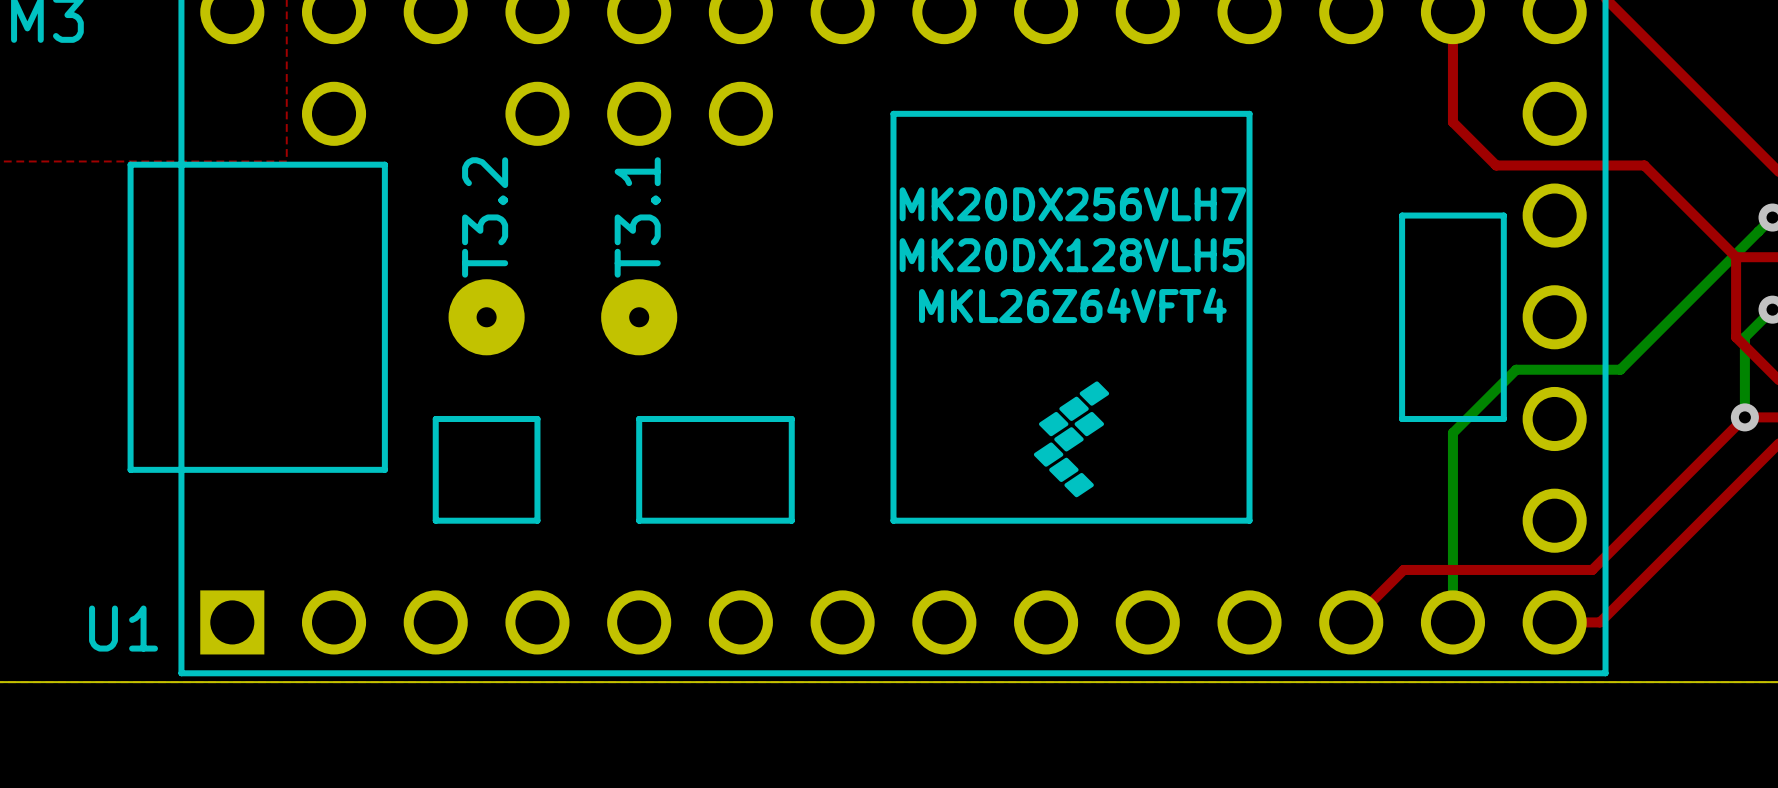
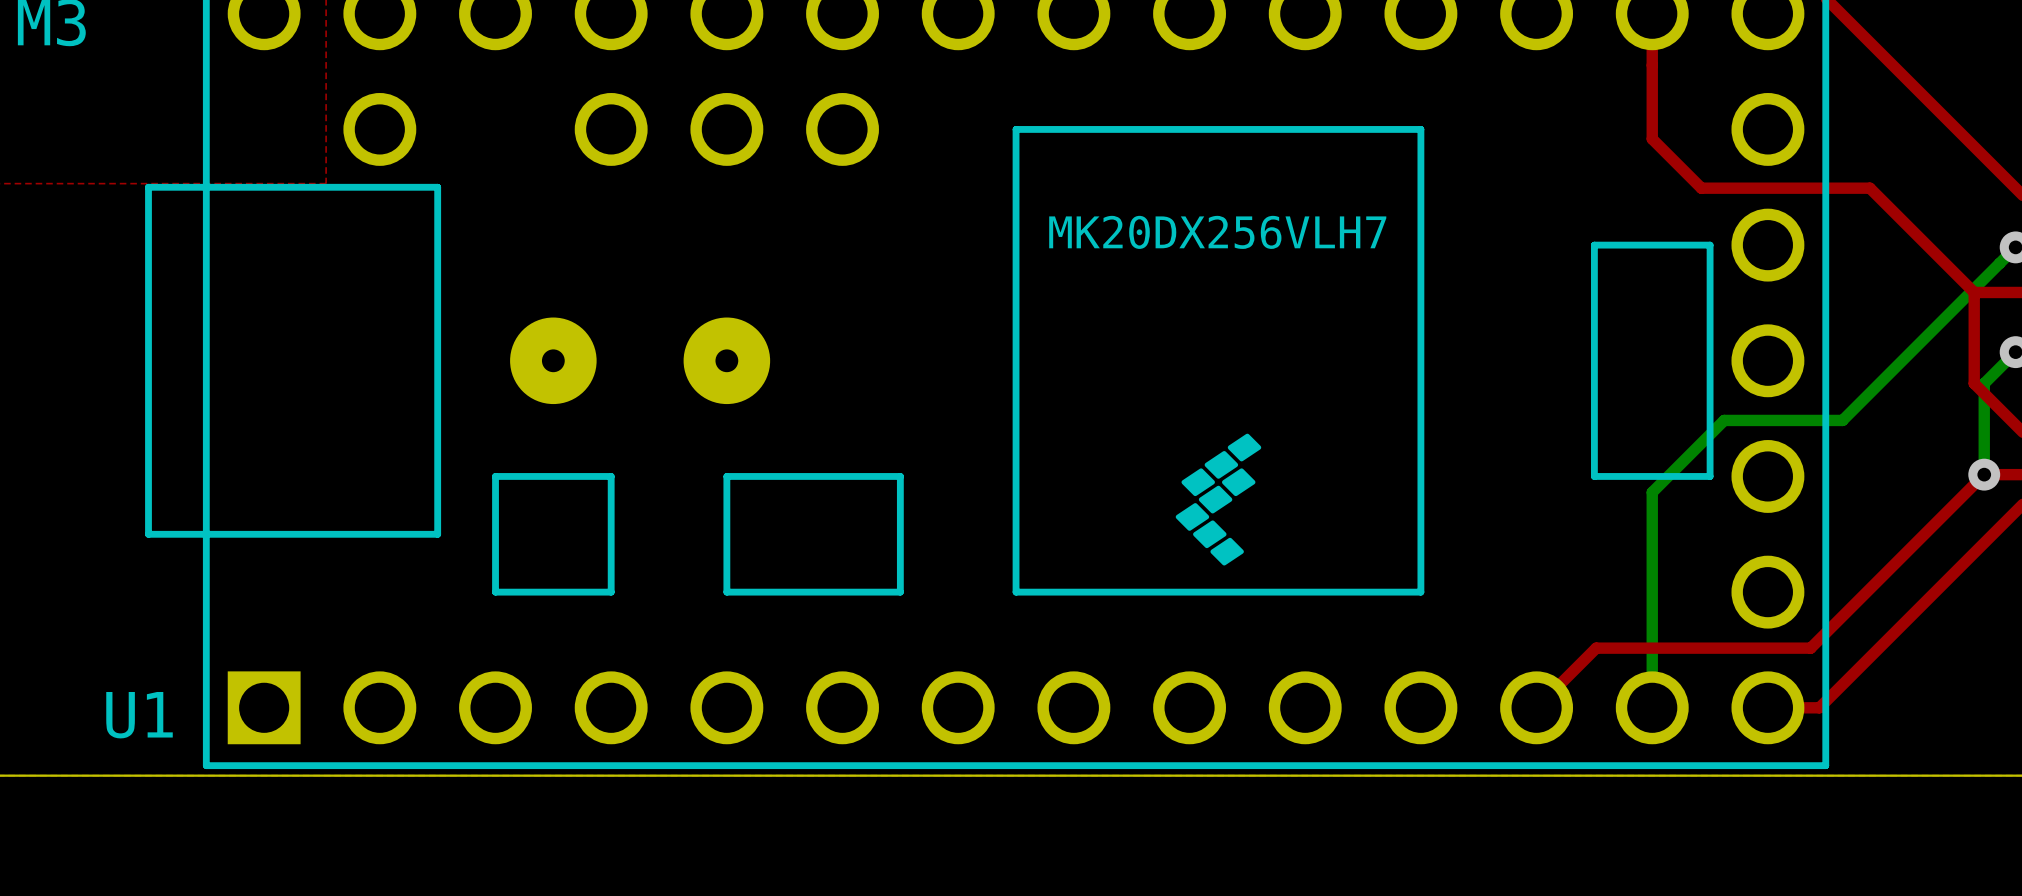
U1 text: T3.2 (485, 217) -> none
U1 text: T3.1 (637, 217) -> none
U1 text: MK20DX128VLH5 (1072, 255) -> none
U1 text: MKL26Z64VFT4 (1072, 305) -> none

